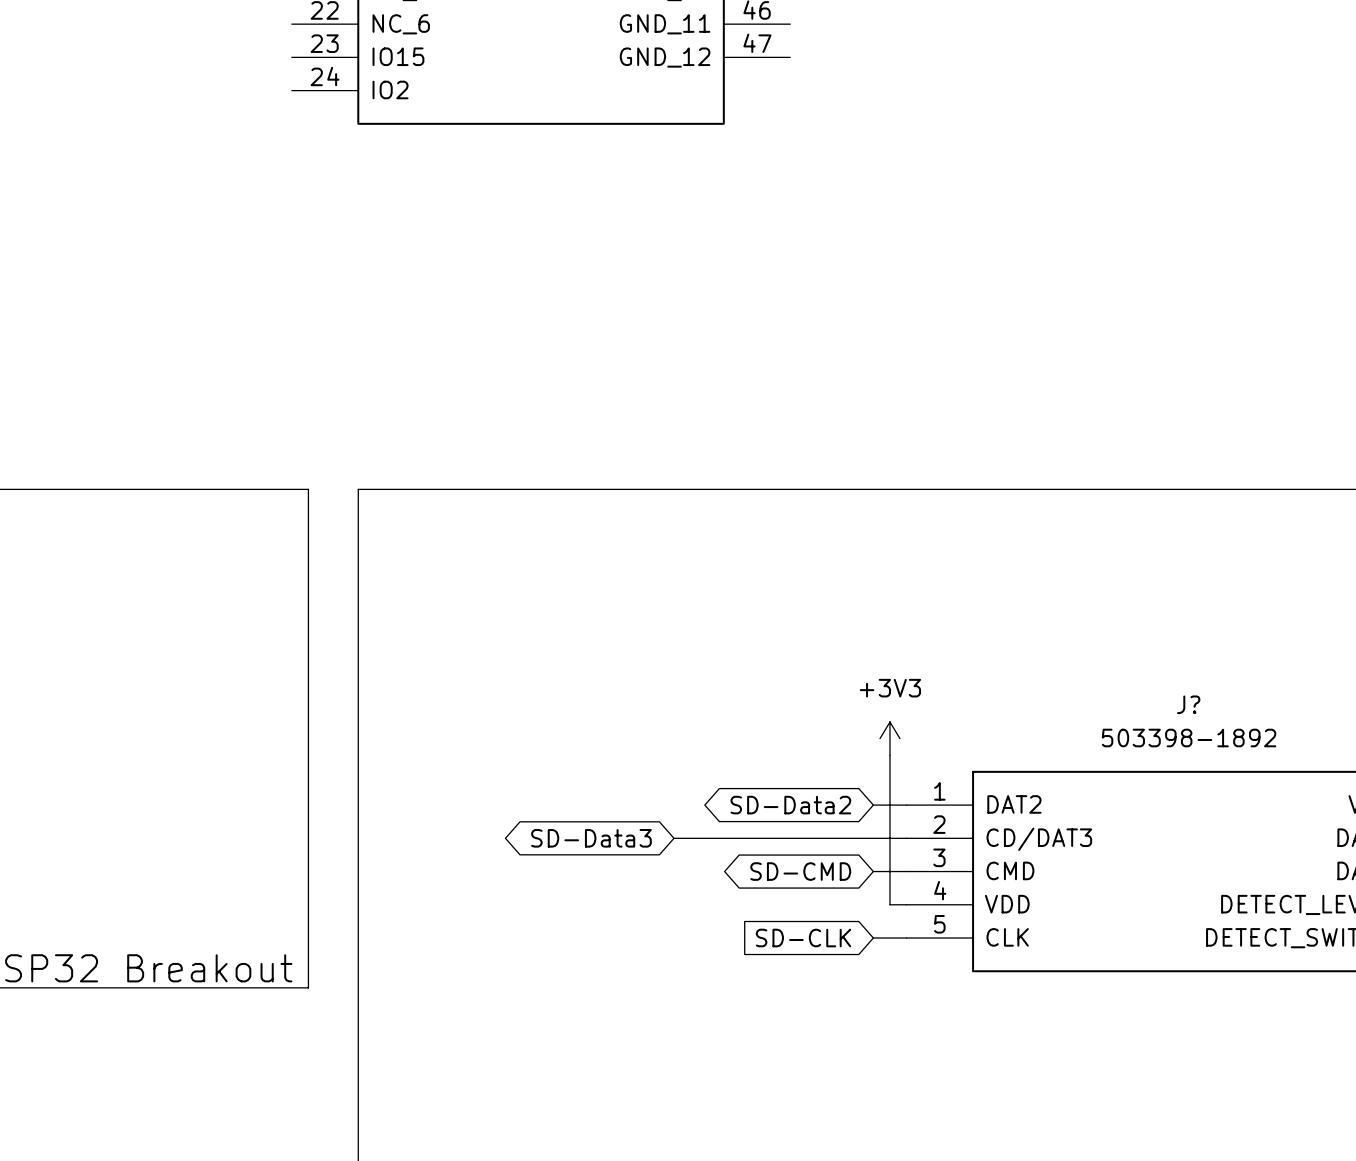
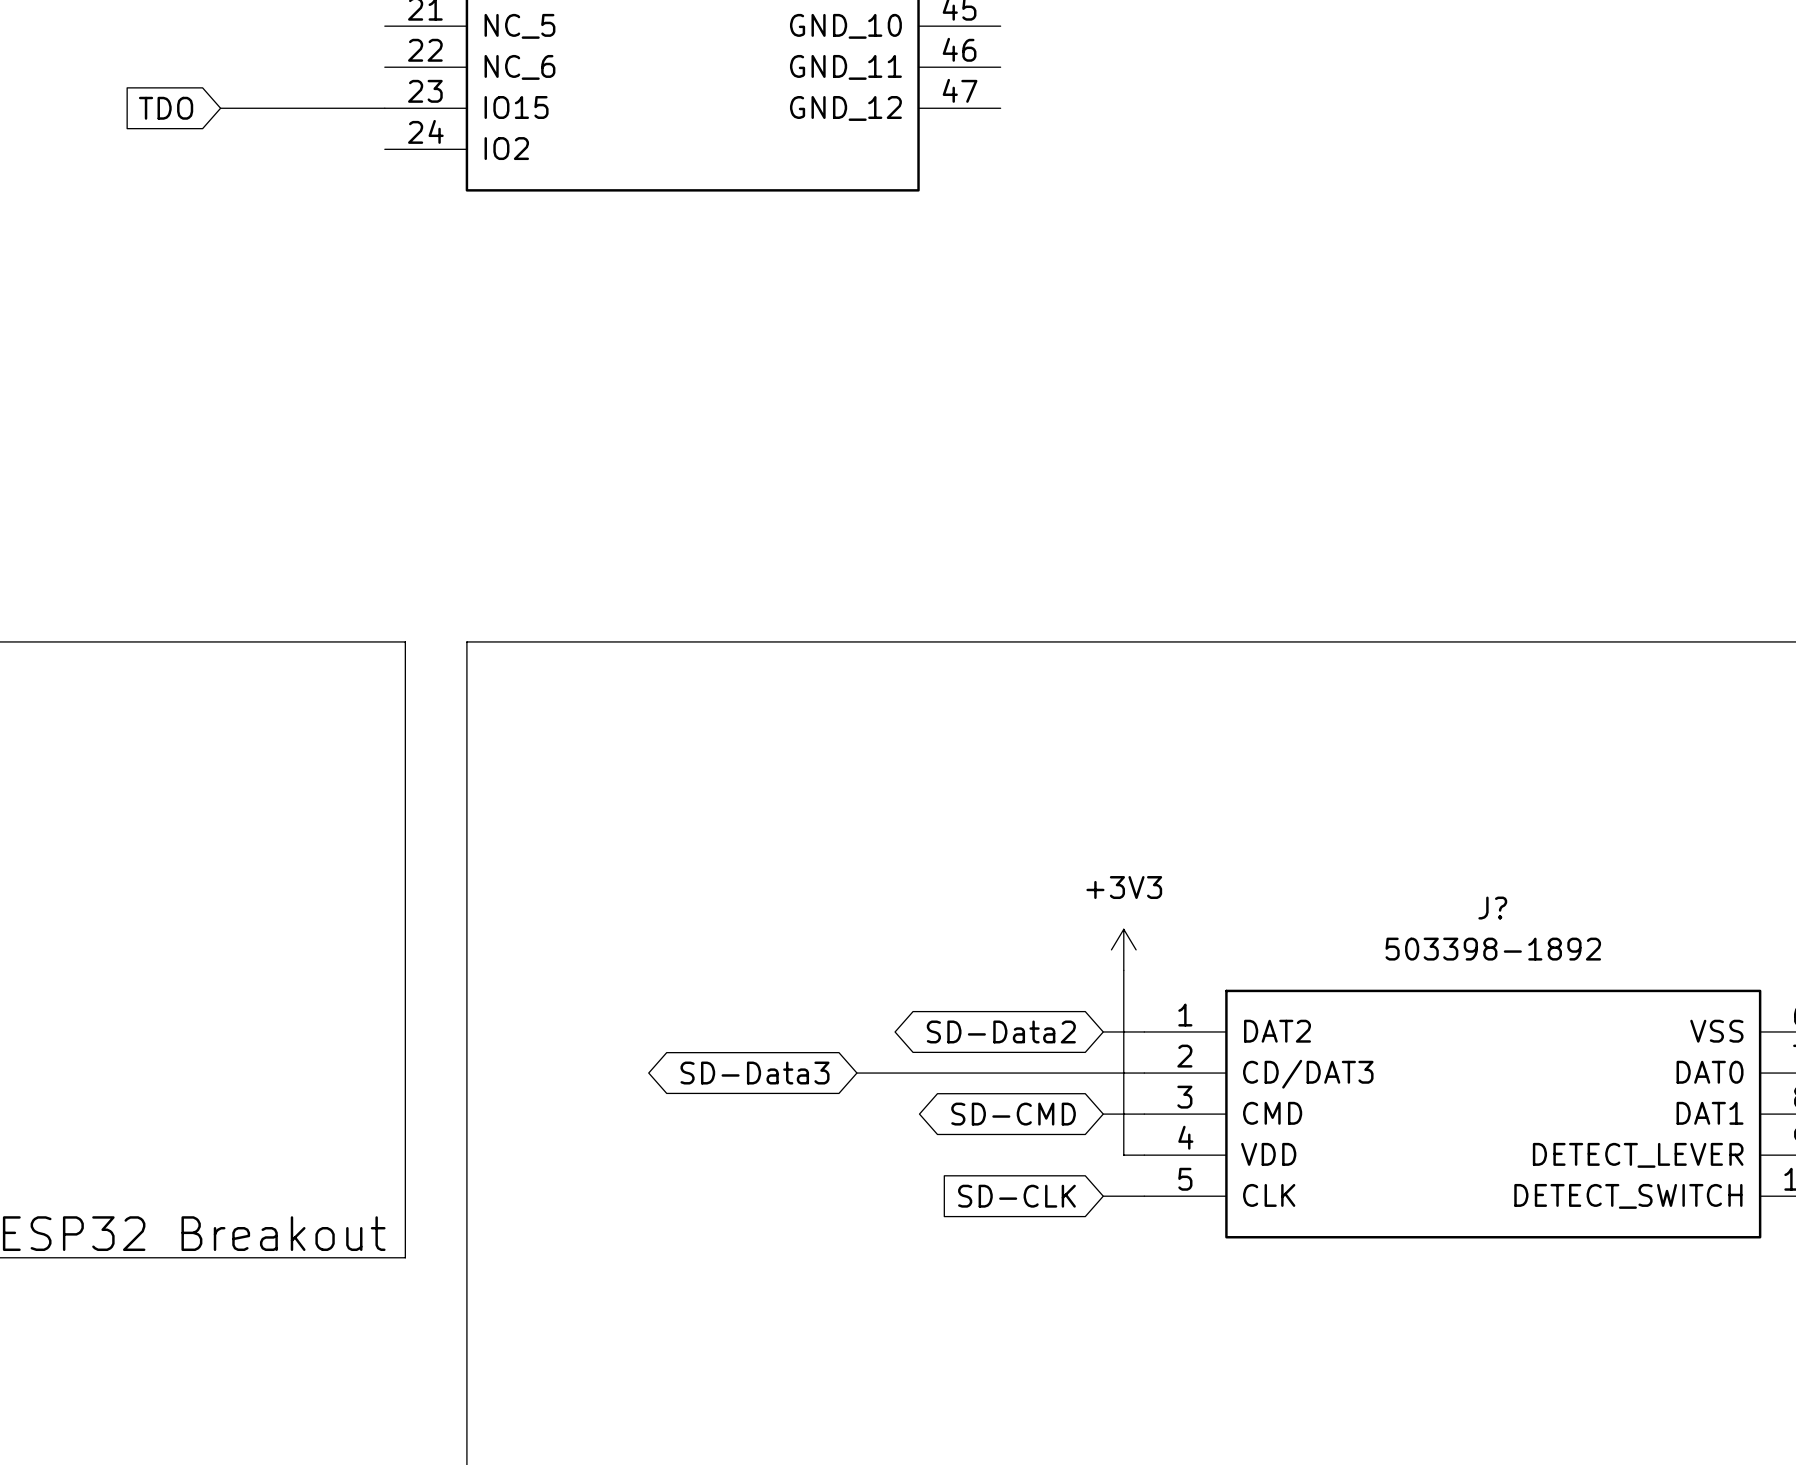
global label: none -> TDO (166, 108)
wire: none -> (220, 108) (384, 108)

